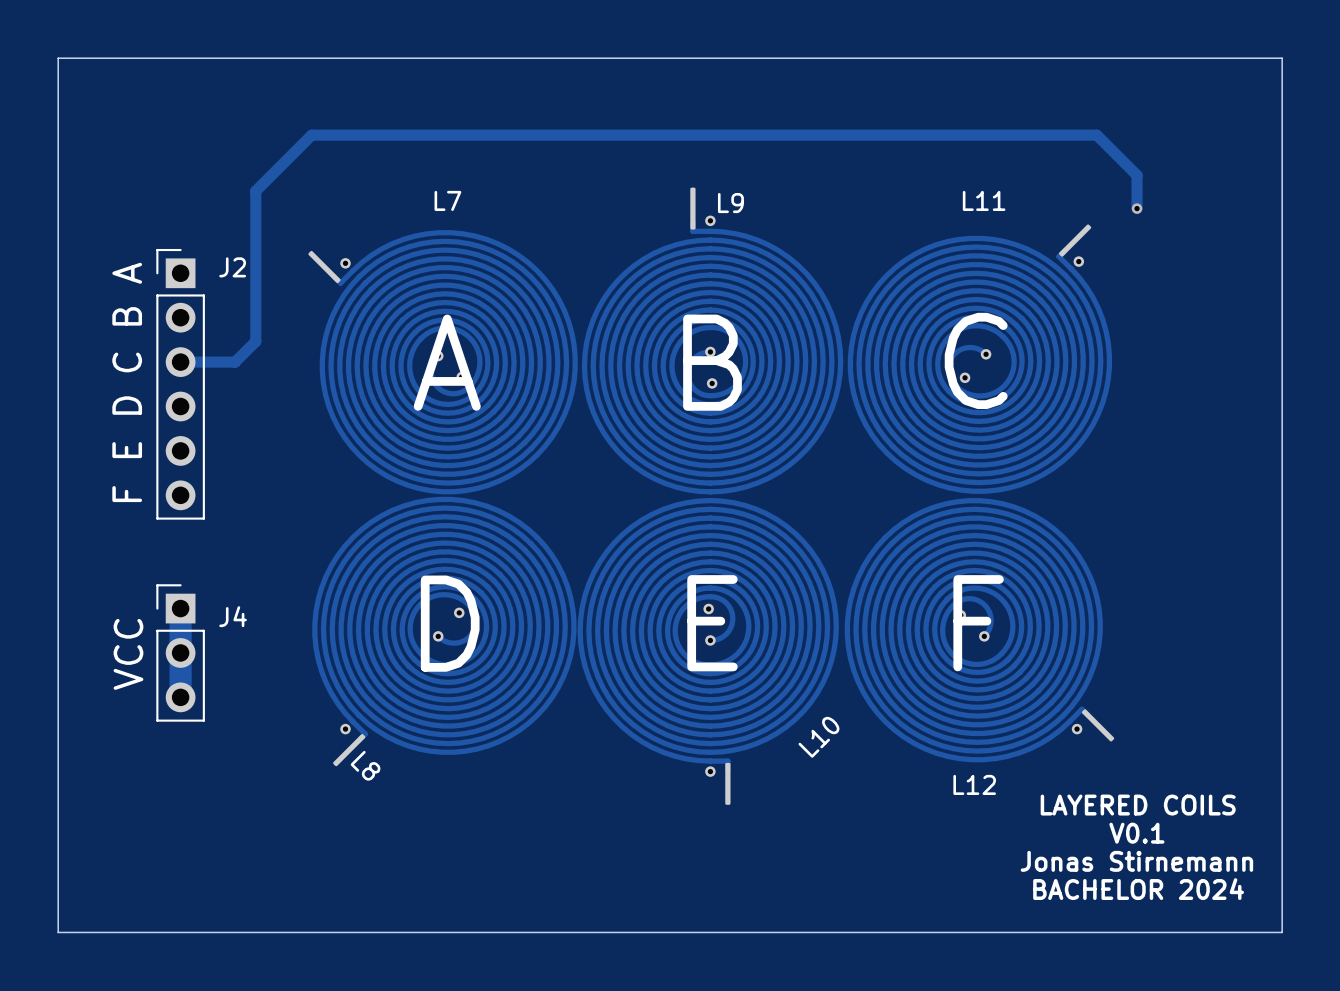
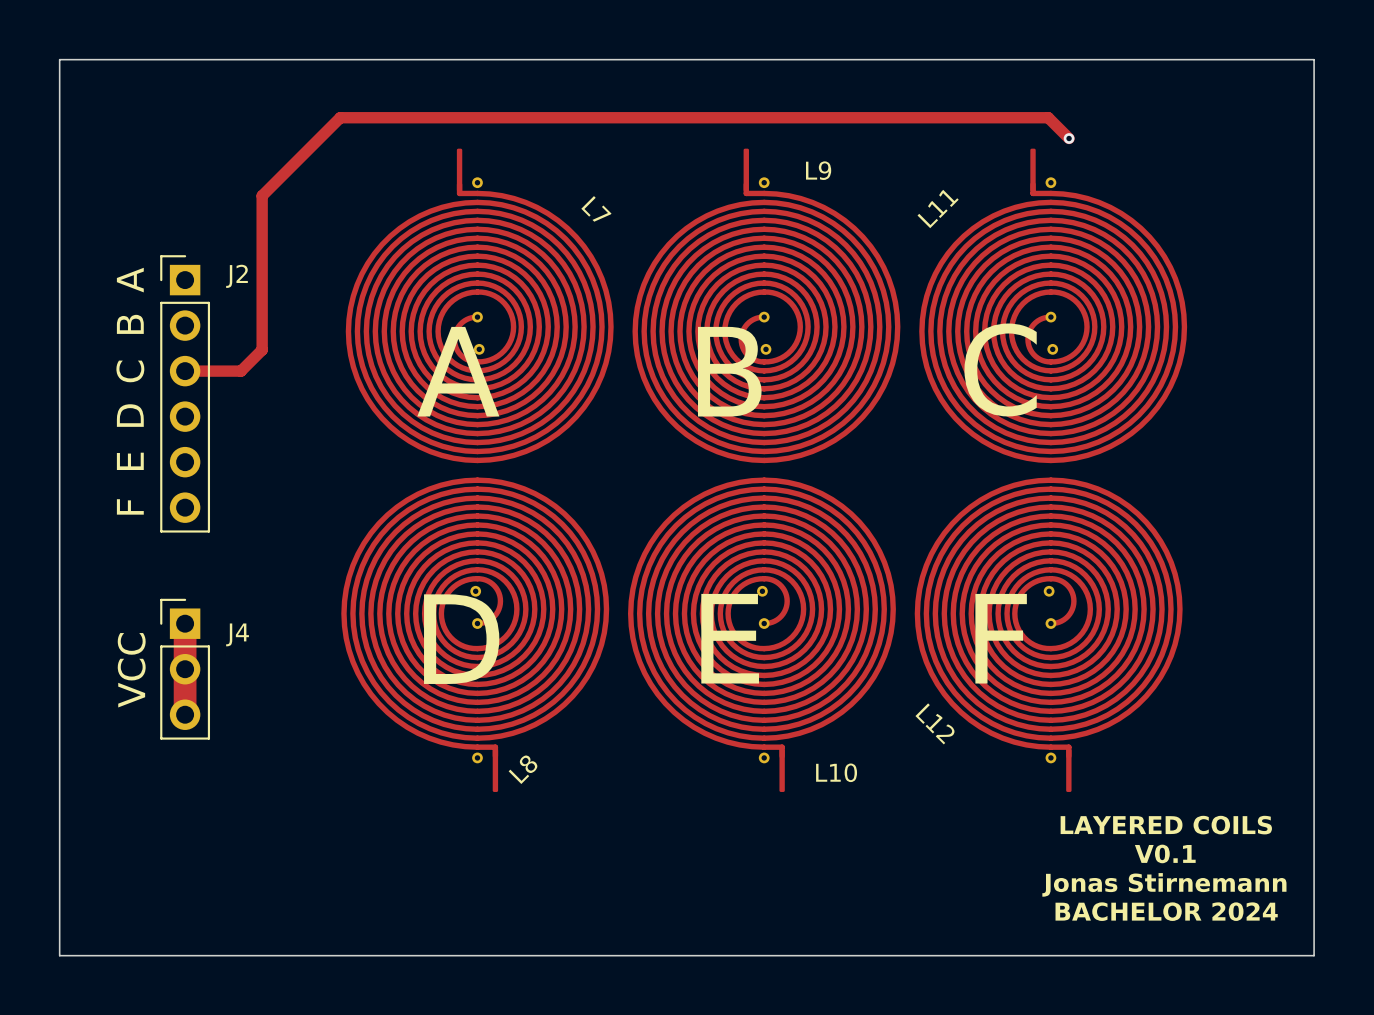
track: (311, 135) (1096, 135) (1137, 175) (1137, 208) -> (319, 138) (340, 117) (1048, 117) (1069, 138)
via: none -> (1069, 138)
L7 name position: L7 (447, 200) -> L7 (596, 208)
L11 name position: L11 (984, 200) -> L11 (938, 209)
L9 name position: L9 (730, 203) -> L9 (818, 170)
via: (1137, 208) -> none
L11 footprint: [847, 224, 1113, 494] -> [919, 148, 1188, 464]
L7 footprint: [308, 230, 578, 495] -> [345, 148, 614, 464]
L9 position: (712, 341) -> (766, 305)
L8 footprint: [312, 496, 577, 767] -> [341, 477, 610, 792]
L12 footprint: [844, 498, 1115, 763] -> [914, 477, 1183, 792]
L10 position: (708, 651) -> (761, 634)
L10 name rotation: 0° (818, 737) -> 45° clockwise (836, 772)
L8 name position: L8 (365, 765) -> L8 (523, 769)
L12 name position: L12 (974, 784) -> L12 (935, 723)

